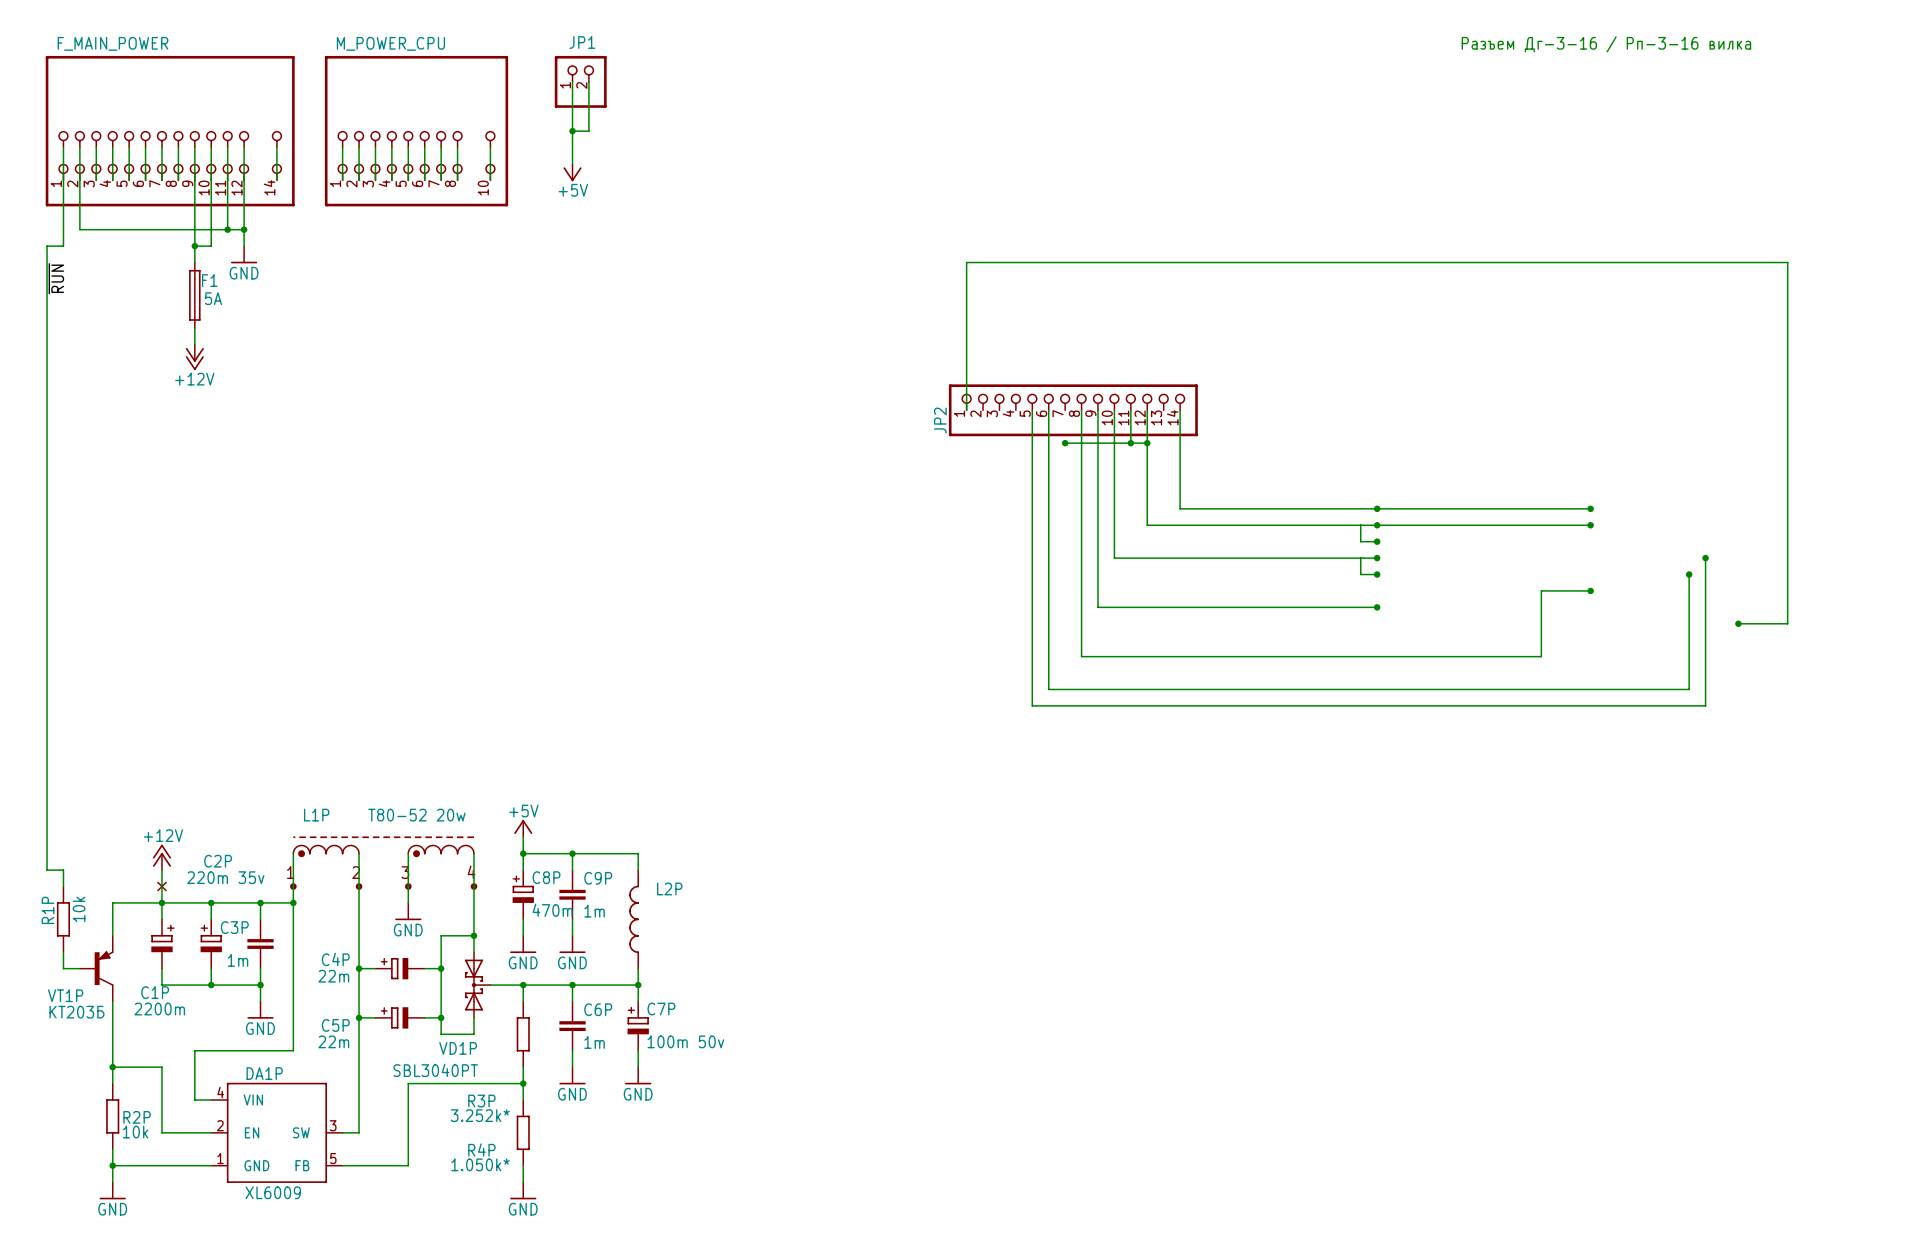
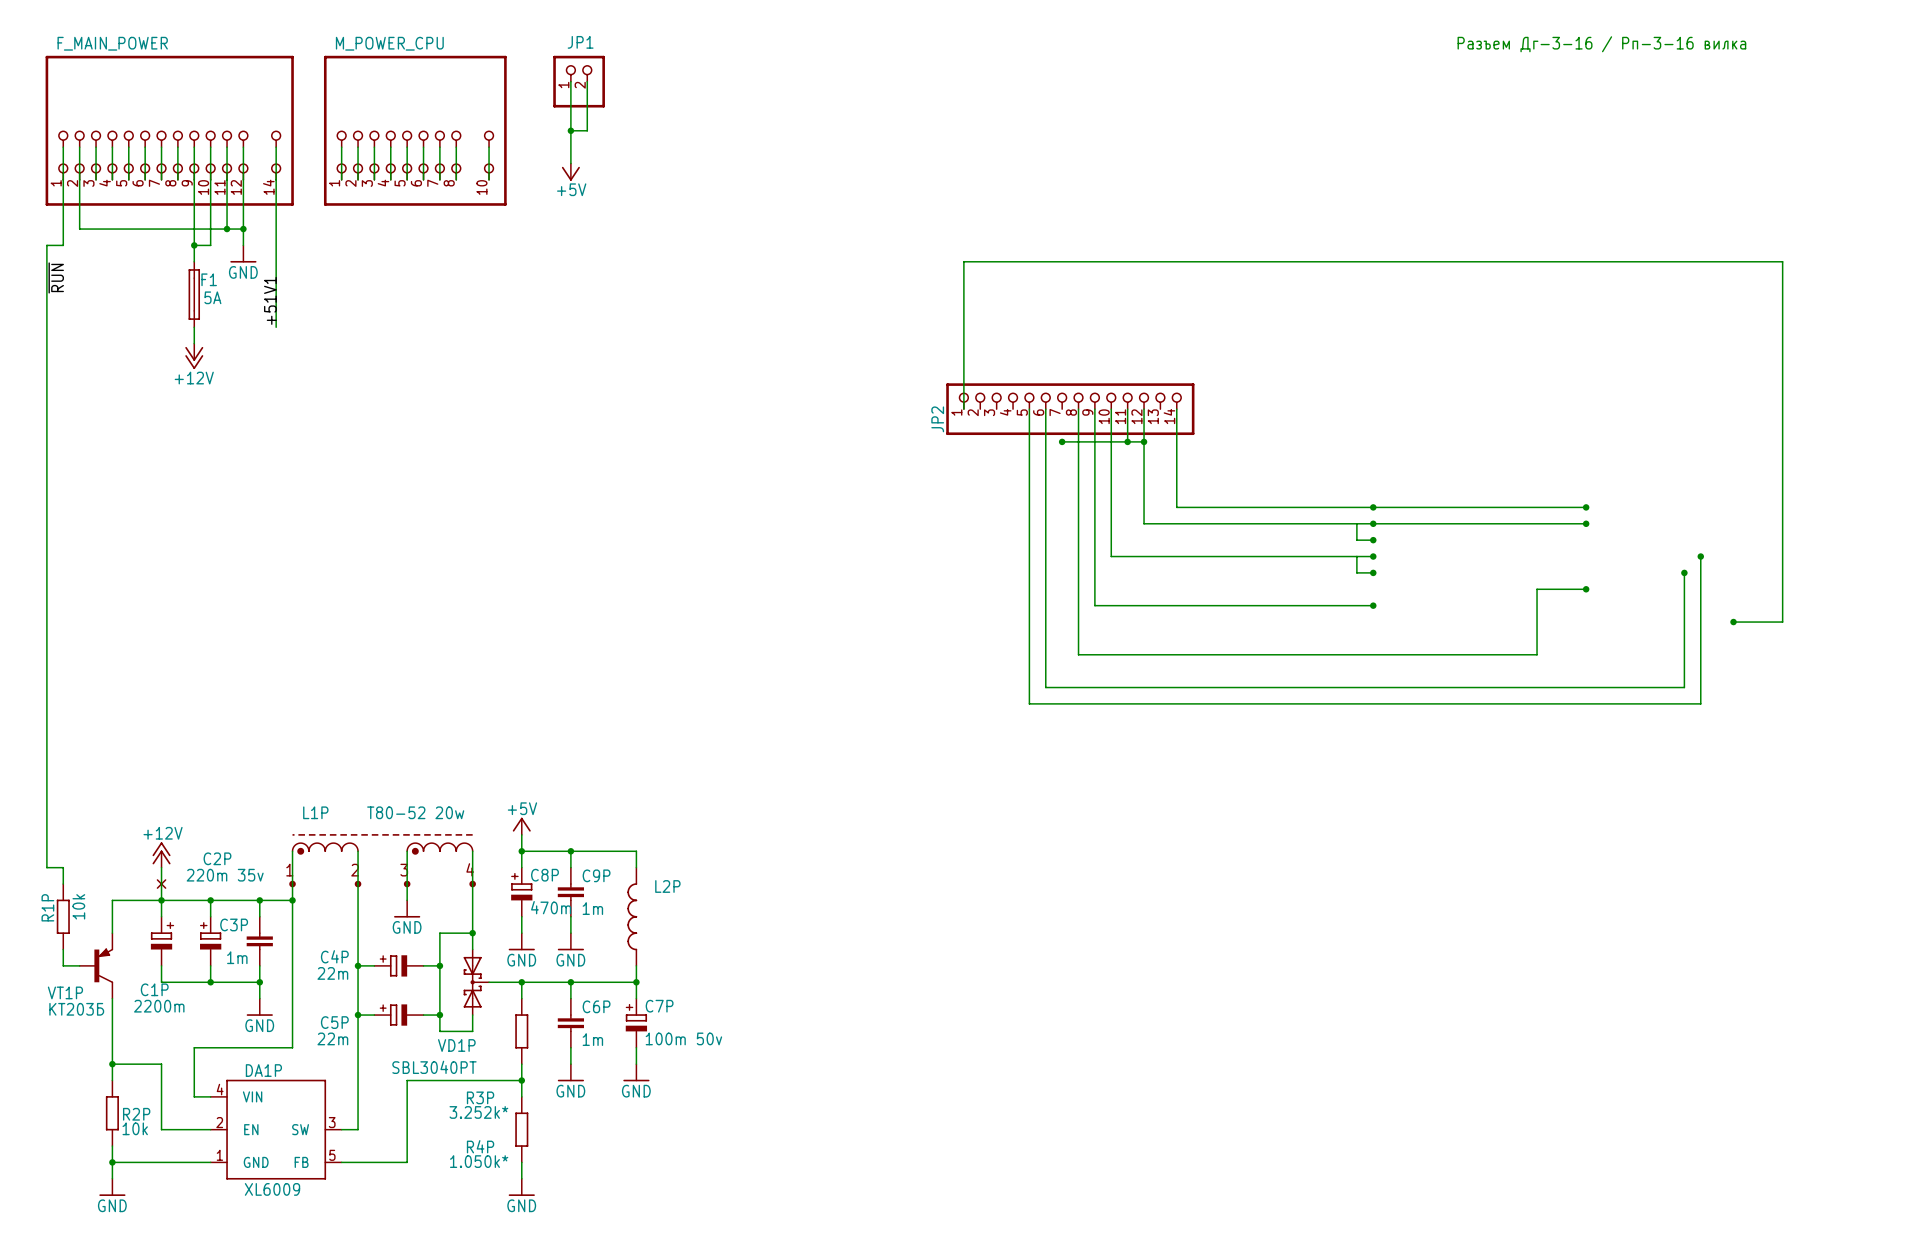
wire: none -> (276, 179) (276, 327)
label: none -> +51V1 (270, 300)

